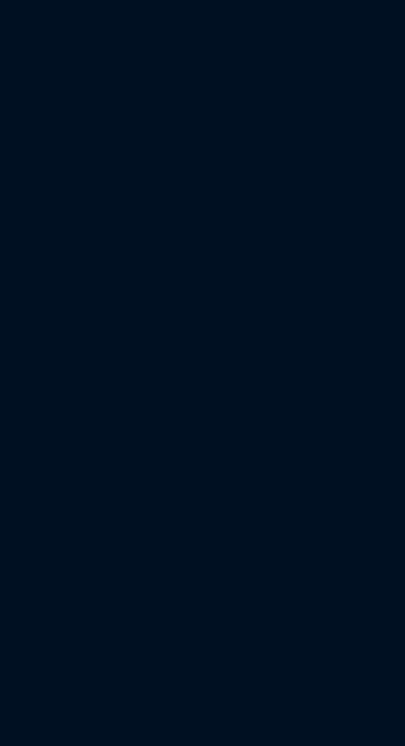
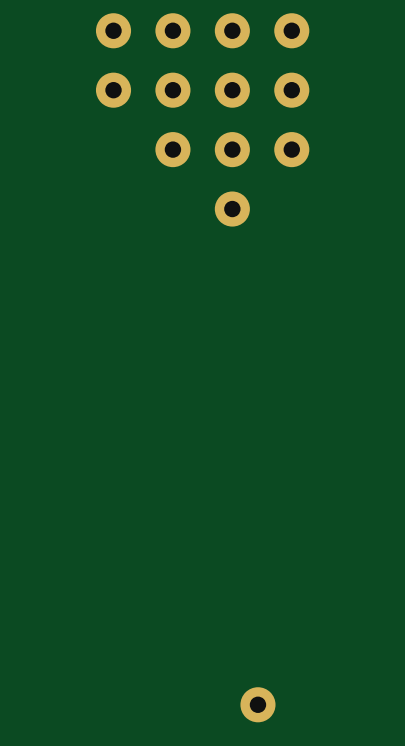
part: none -> (113, 30)
part: none -> (172, 30)
part: none -> (232, 30)
part: none -> (291, 30)
part: none -> (113, 90)
part: none -> (172, 90)
part: none -> (232, 90)
part: none -> (291, 90)
part: none -> (172, 149)
part: none -> (232, 149)
part: none -> (291, 149)
part: none -> (232, 209)
part: none -> (257, 704)

